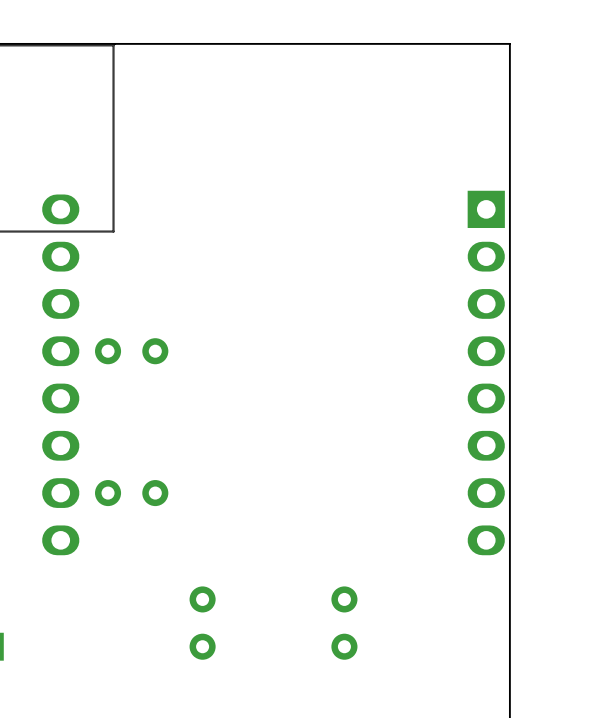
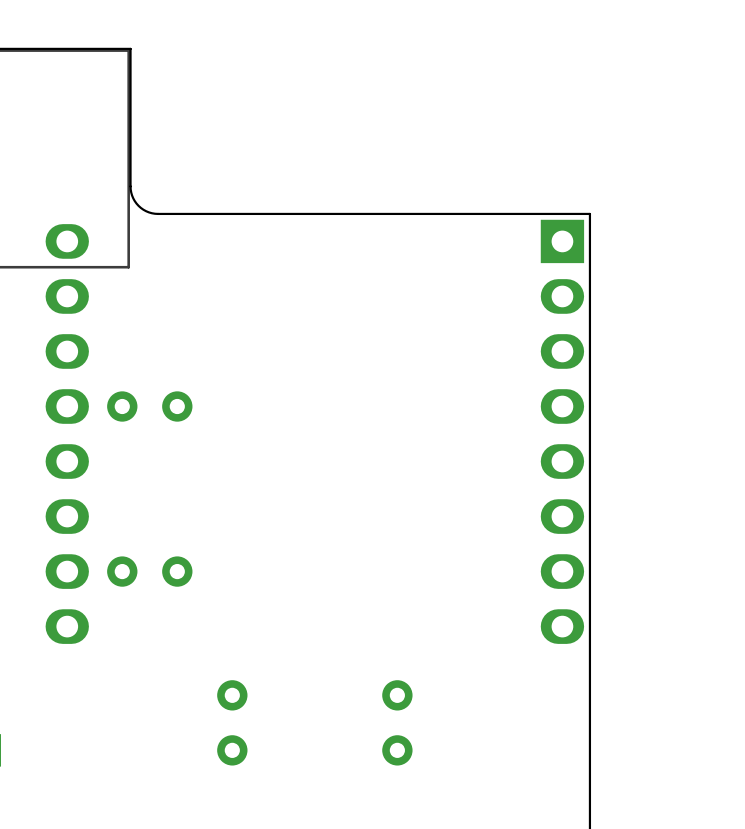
board edge: (115, 43) (509, 43) (509, 185) -> (130, 48) (130, 189) (136, 203) (148, 212) (158, 213) (589, 213)

